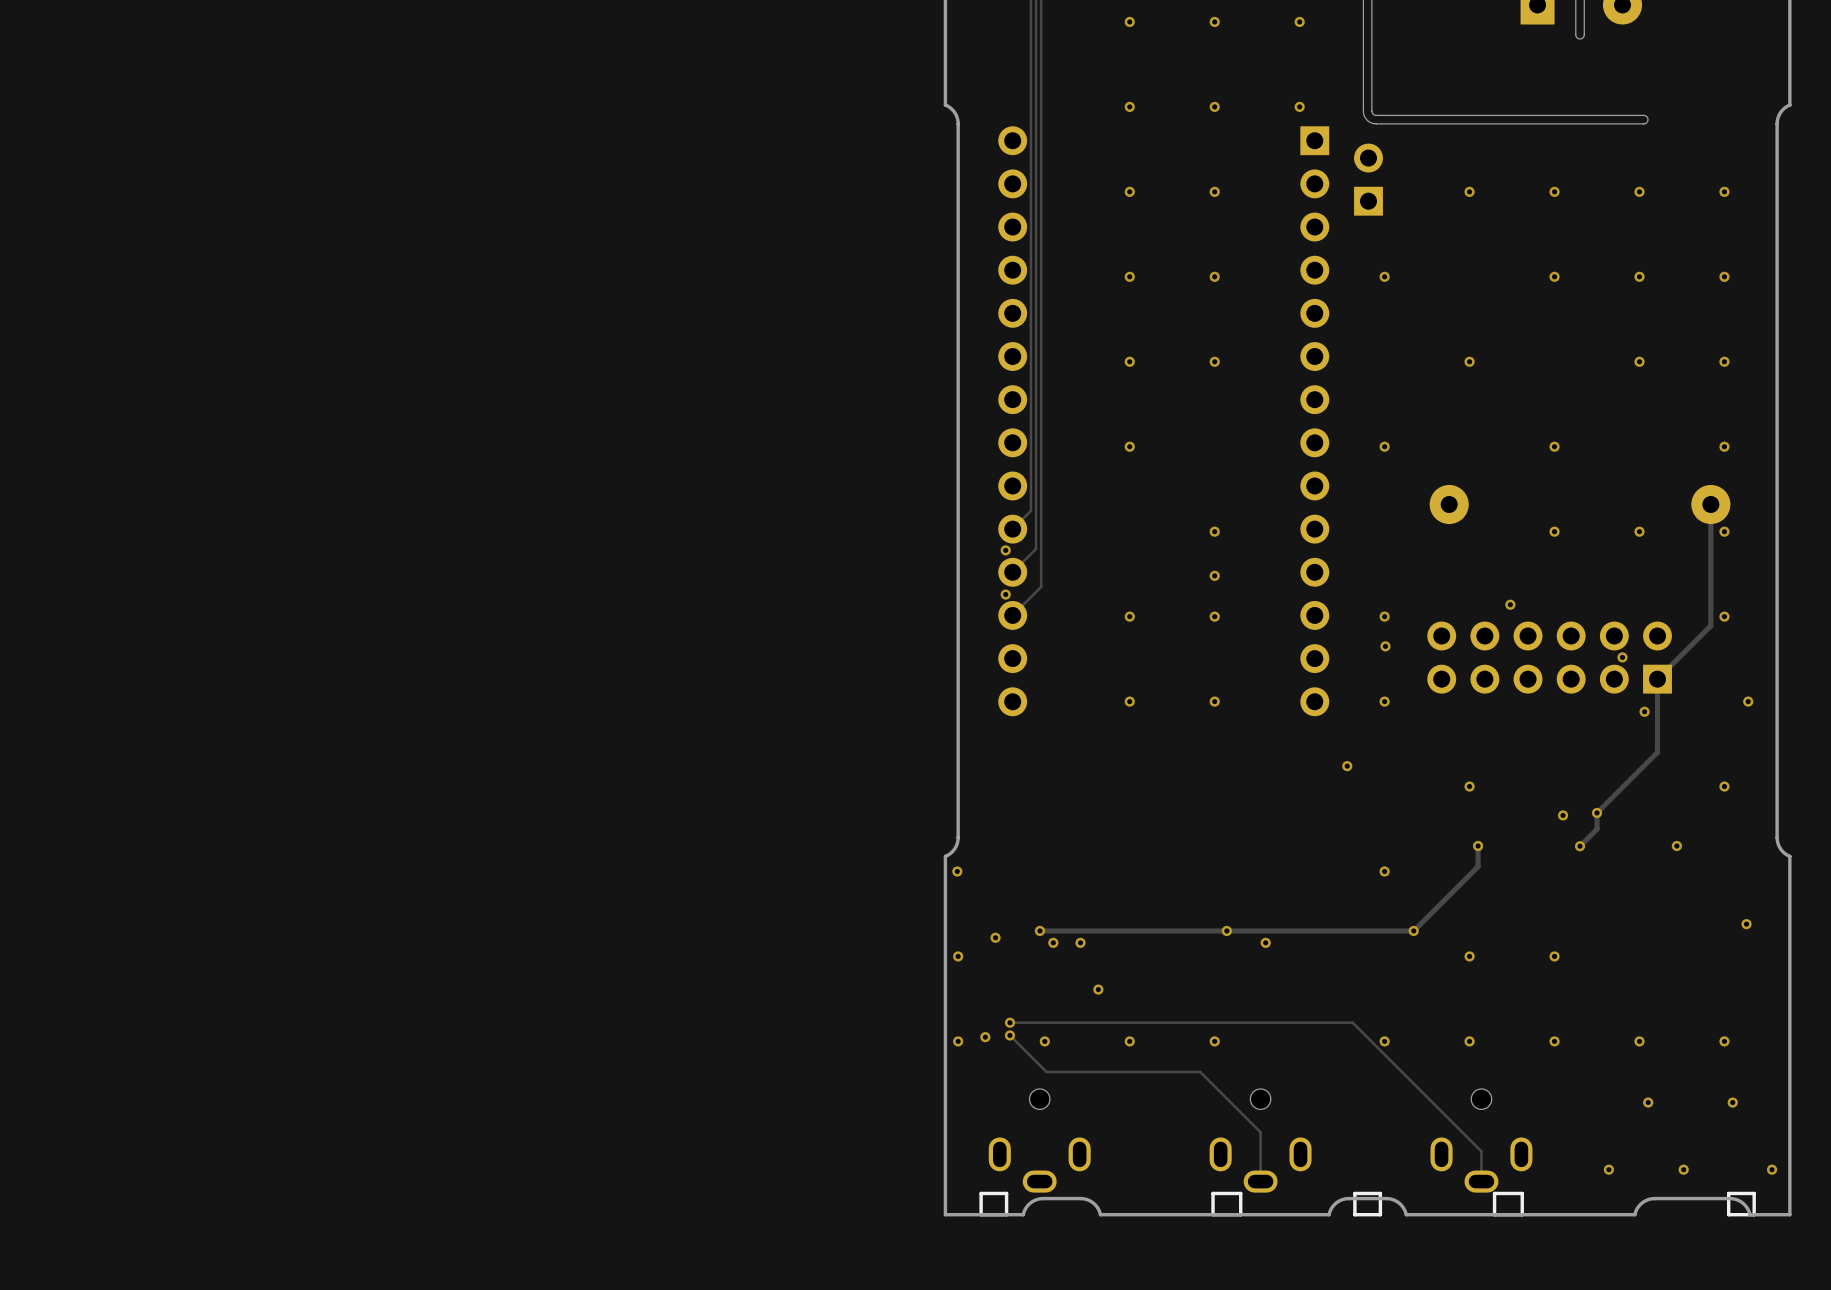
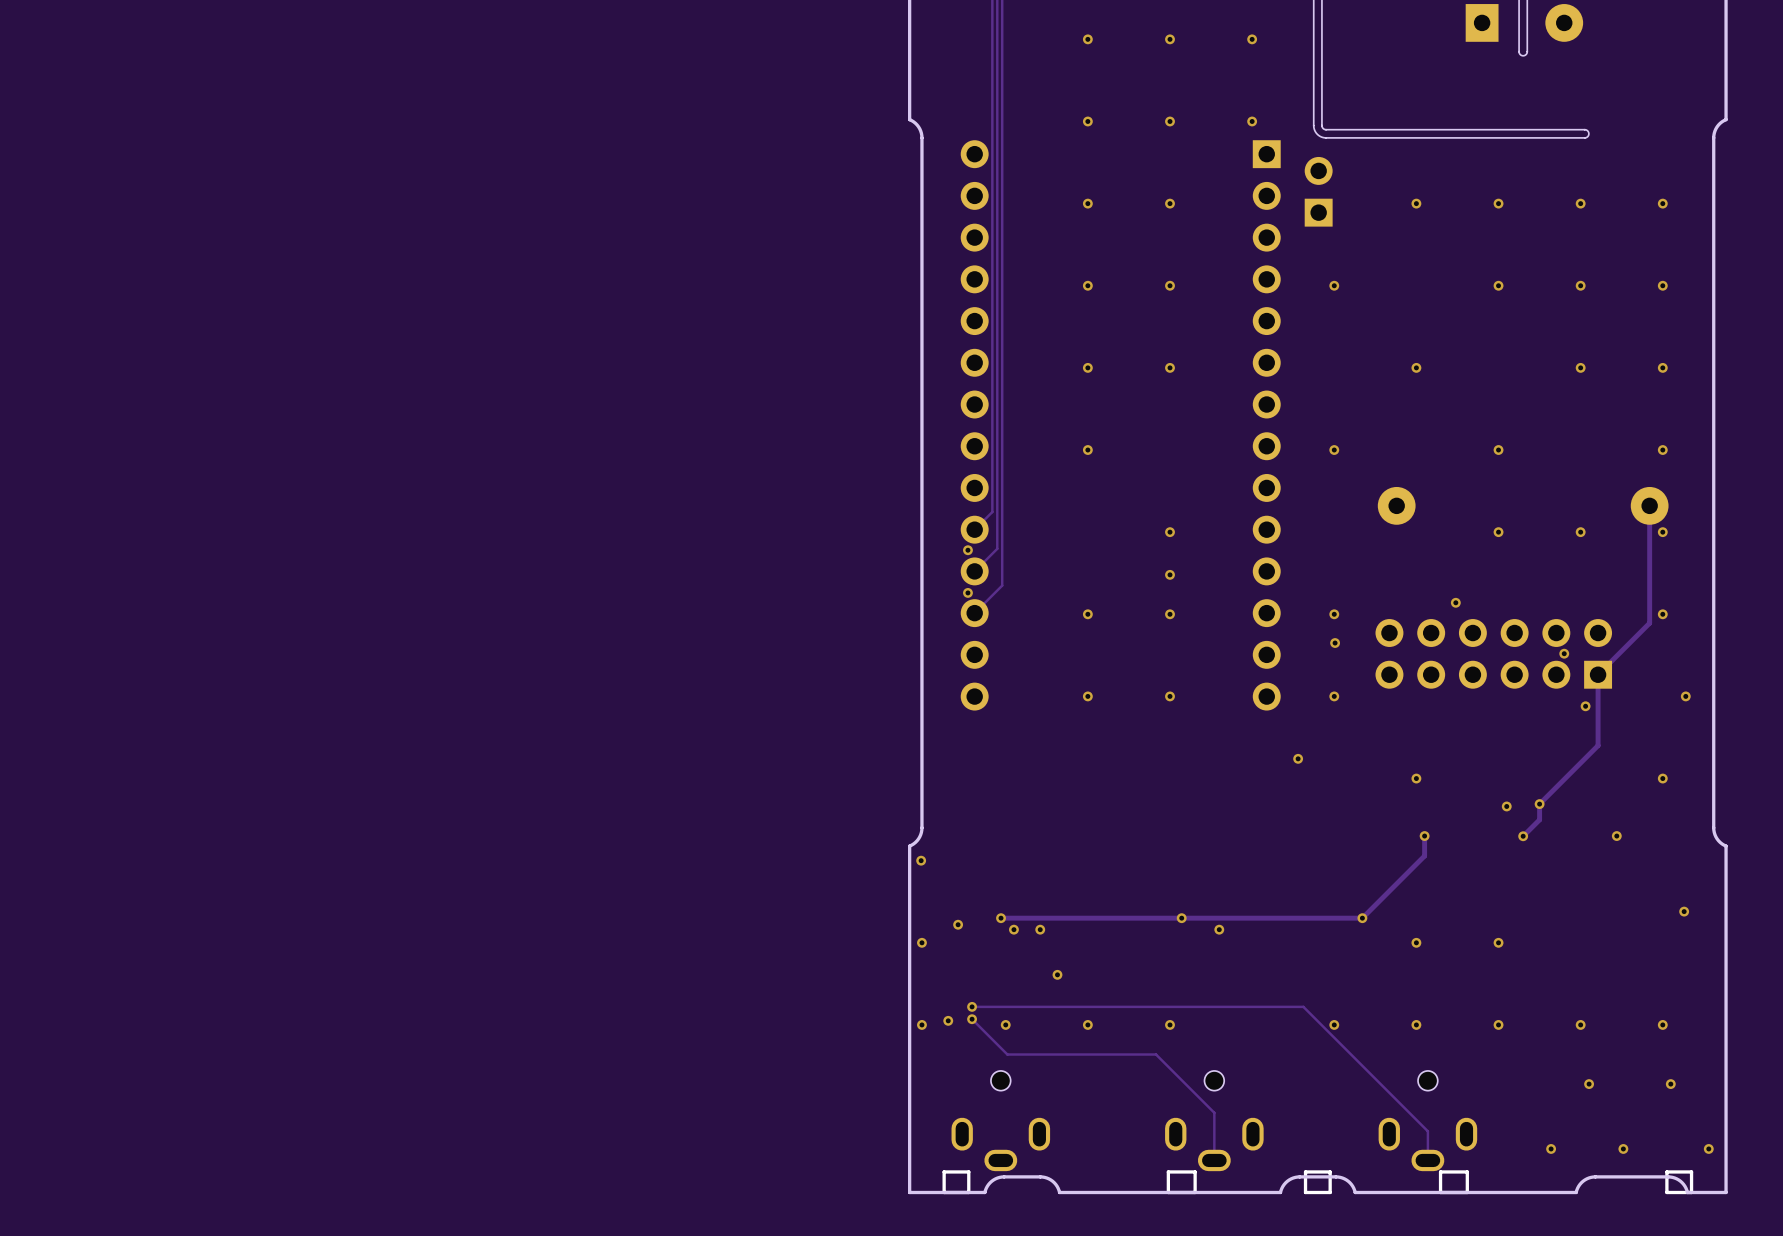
via: (1384, 871) -> none

